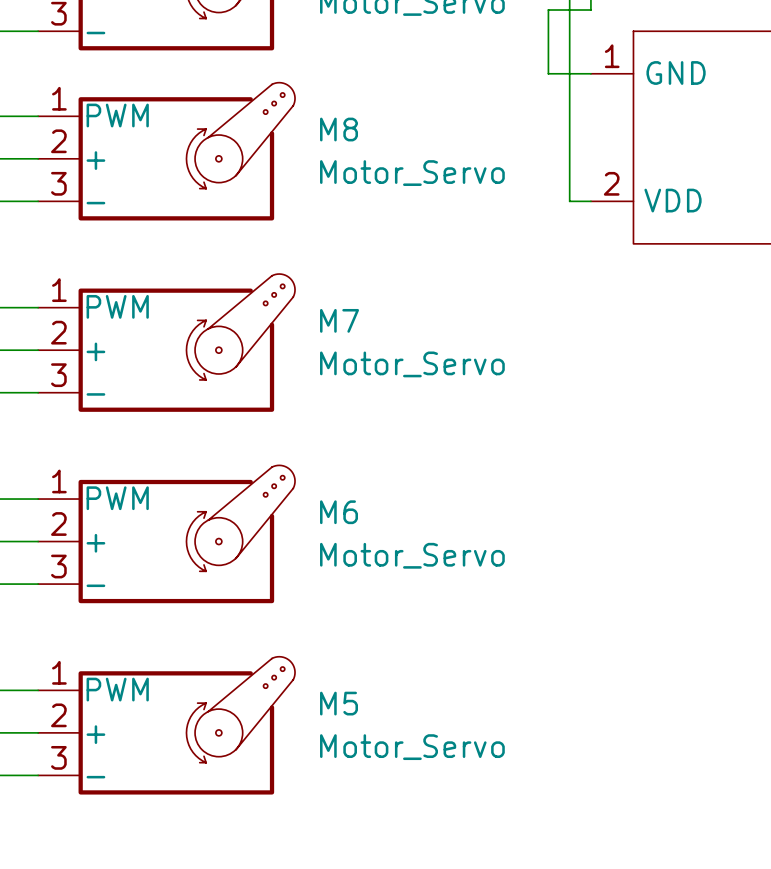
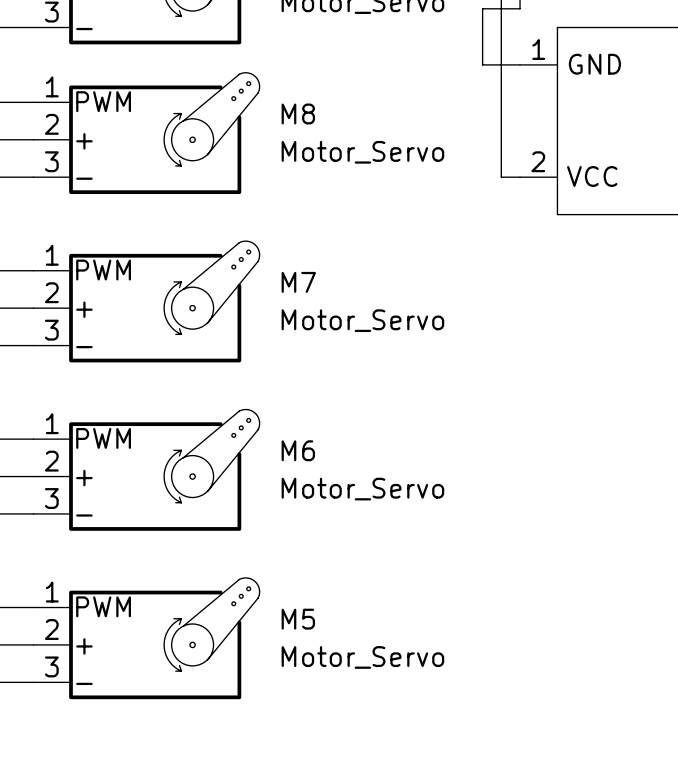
part pin name: VDD (673, 200) -> VCC (592, 176)

